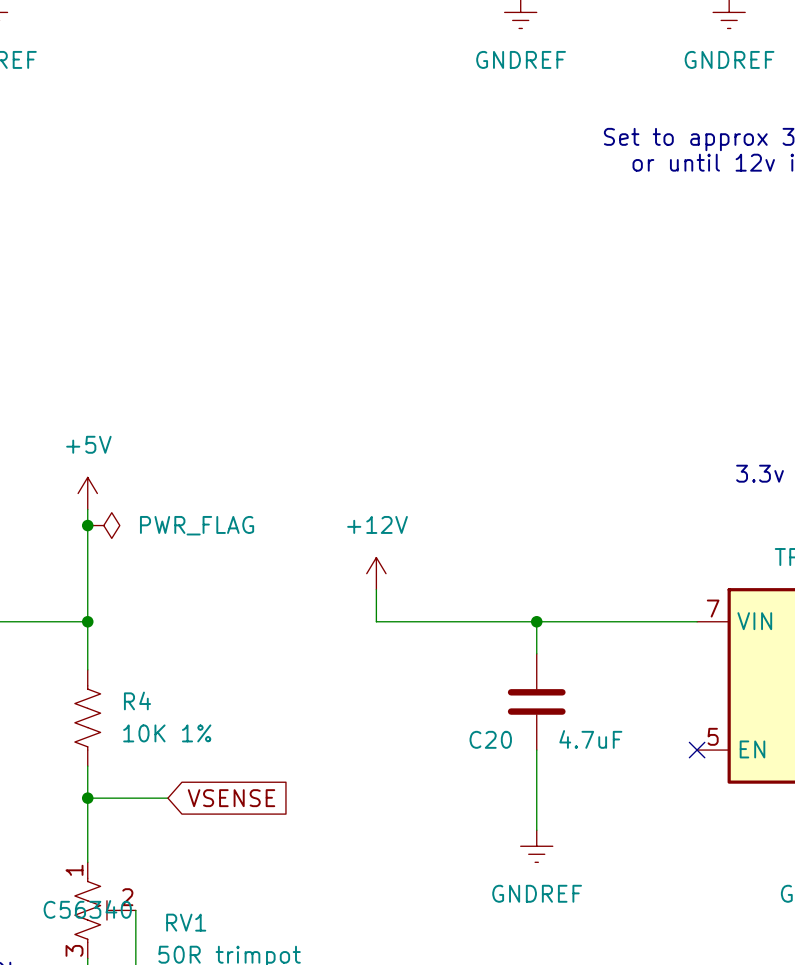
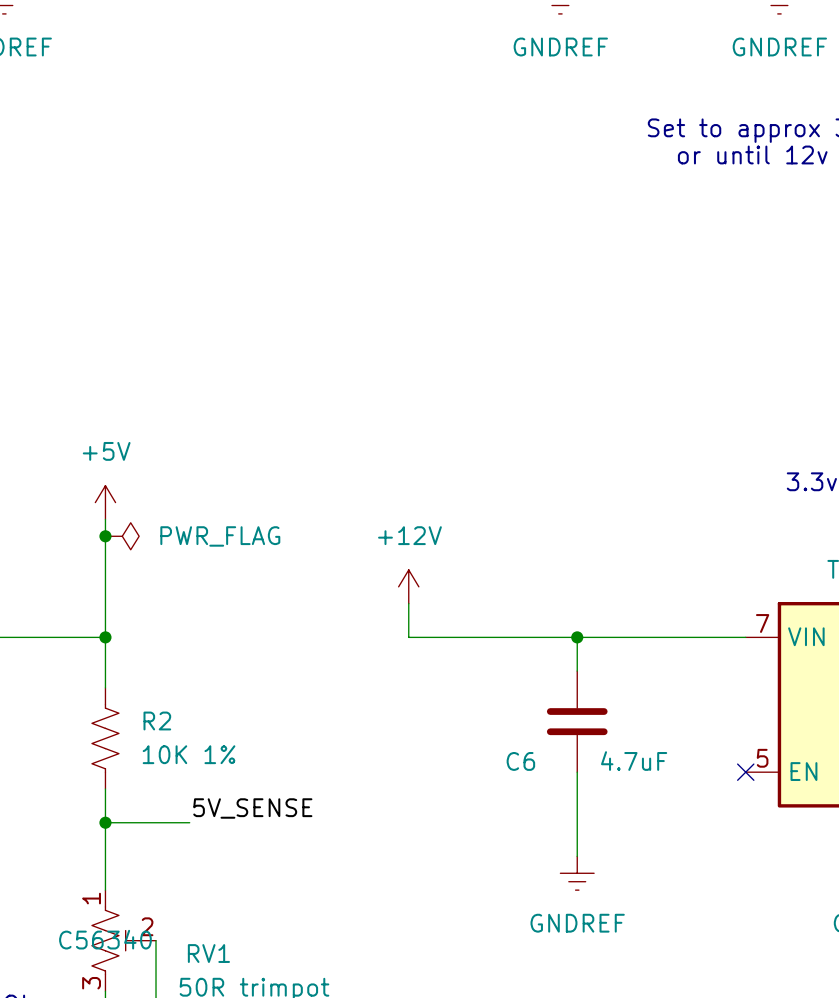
R4 name: R4 (137, 700) -> R2 (157, 721)
C20 name: C20 (490, 739) -> C6 (520, 761)
label: none -> 5V_SENSE (252, 808)
global label: VSENSE (231, 798) -> none

